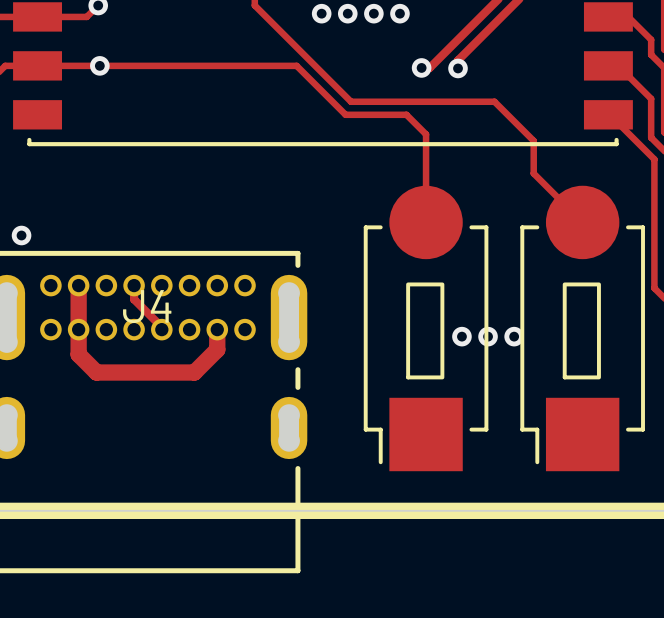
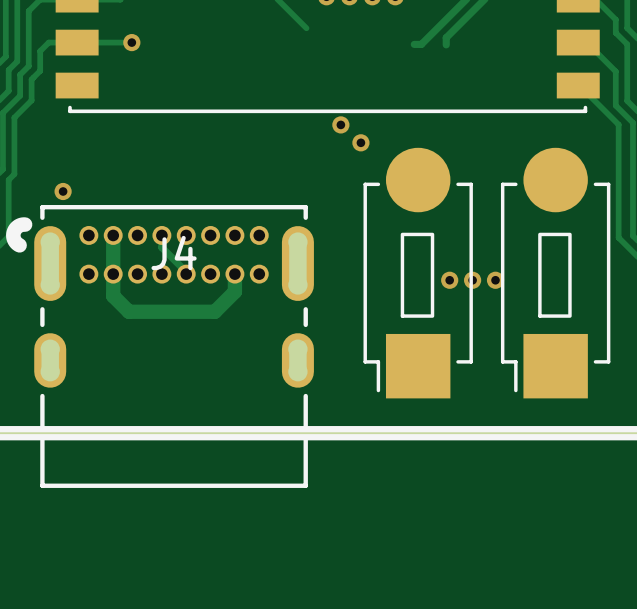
track: (298, 49) (351, 101) (494, 101) (533, 140) (533, 173) (582, 222) -> none
track: (99, 65) (296, 65) (345, 114) (406, 114) (426, 134) (426, 222) -> none
via: (421, 67) -> none
via: (458, 68) -> none
via: none -> (340, 124)
via: none -> (360, 142)

